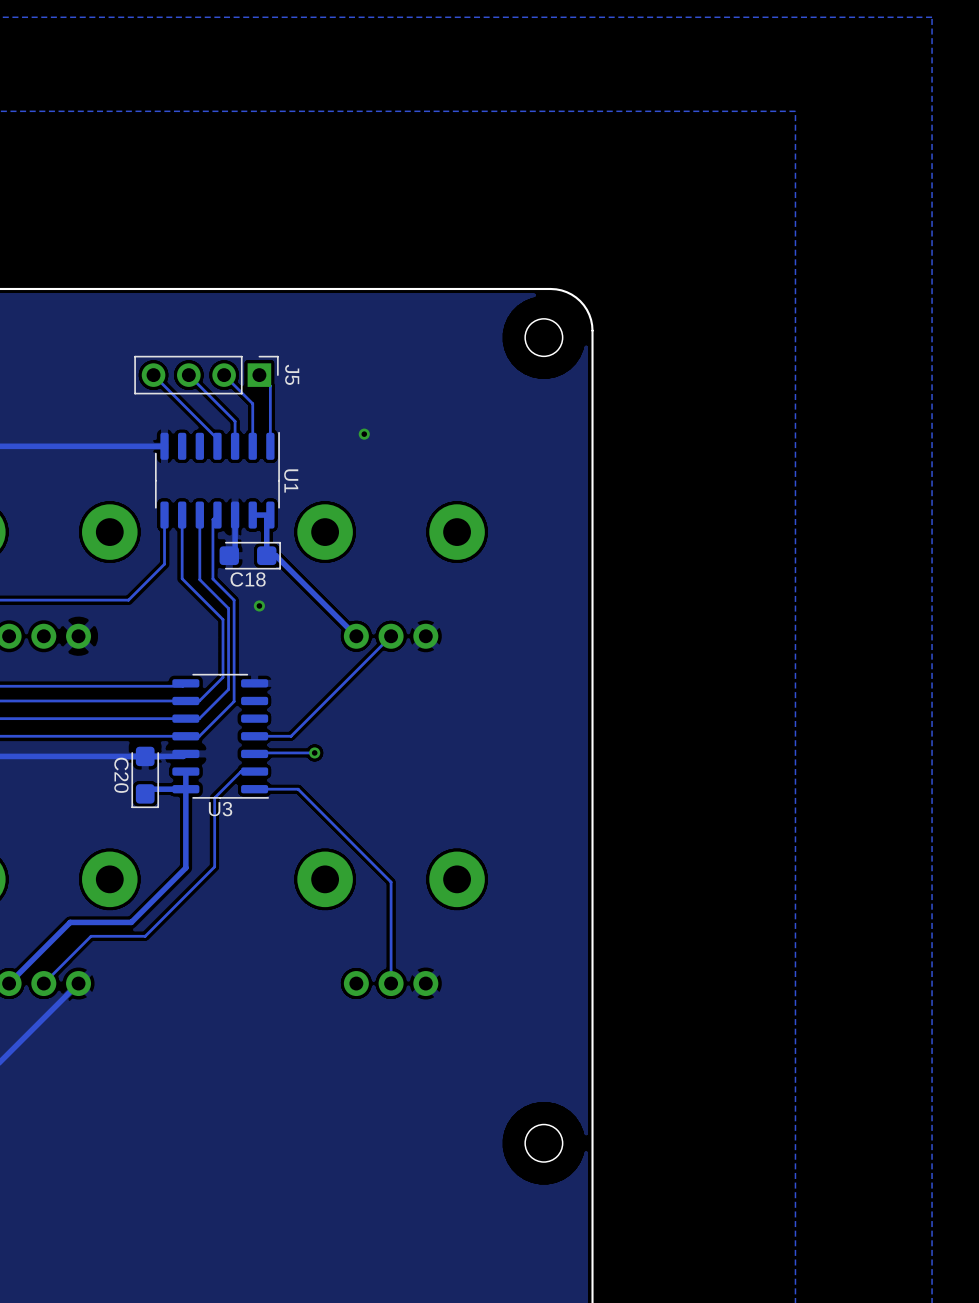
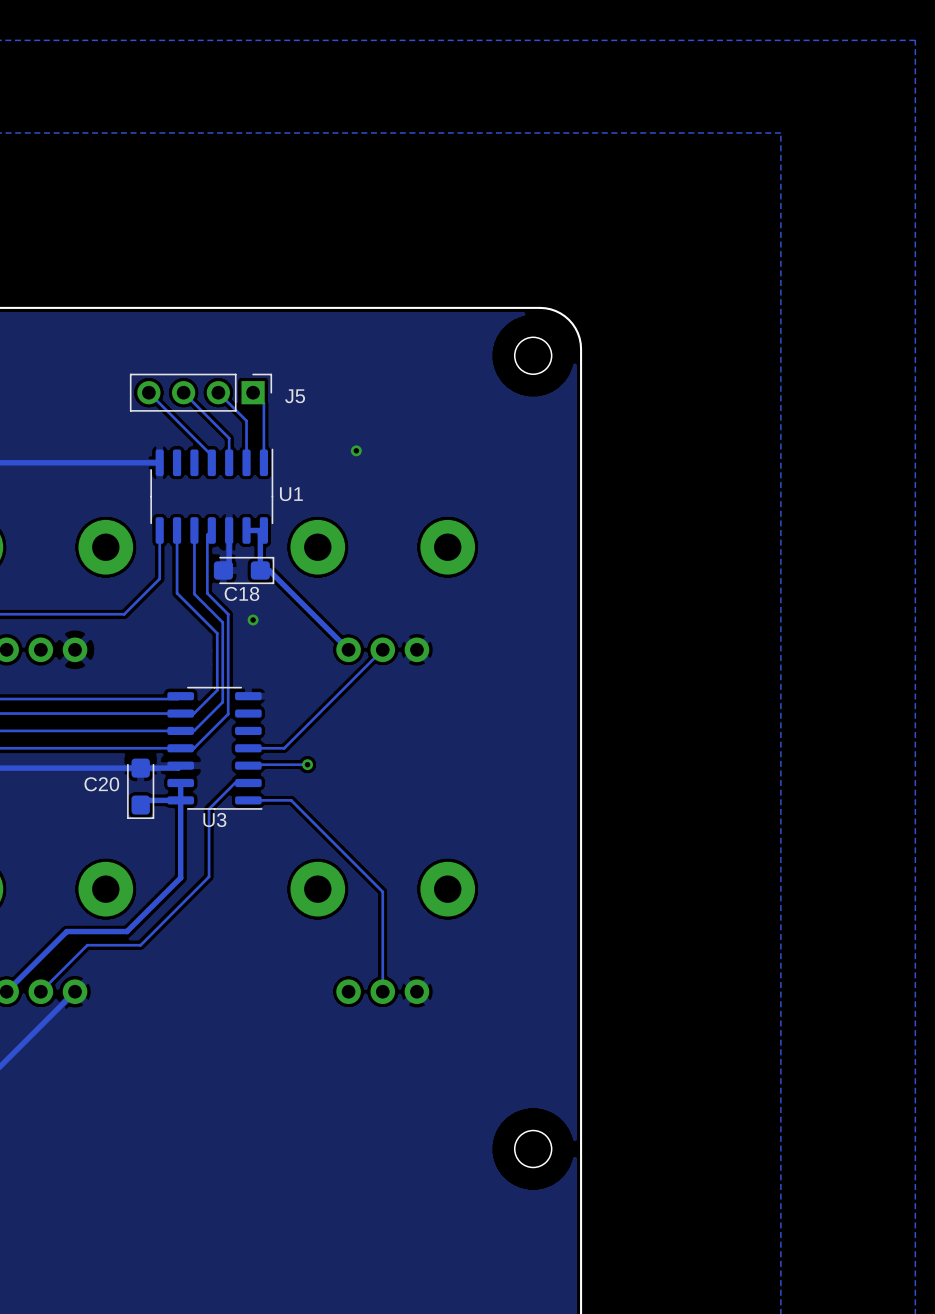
J5 name rotation: 0° (292, 374) -> 90° counterclockwise (295, 396)
U1 name rotation: 0° (291, 480) -> 90° counterclockwise (291, 494)
C20 name rotation: 0° (121, 775) -> 90° counterclockwise (101, 784)

